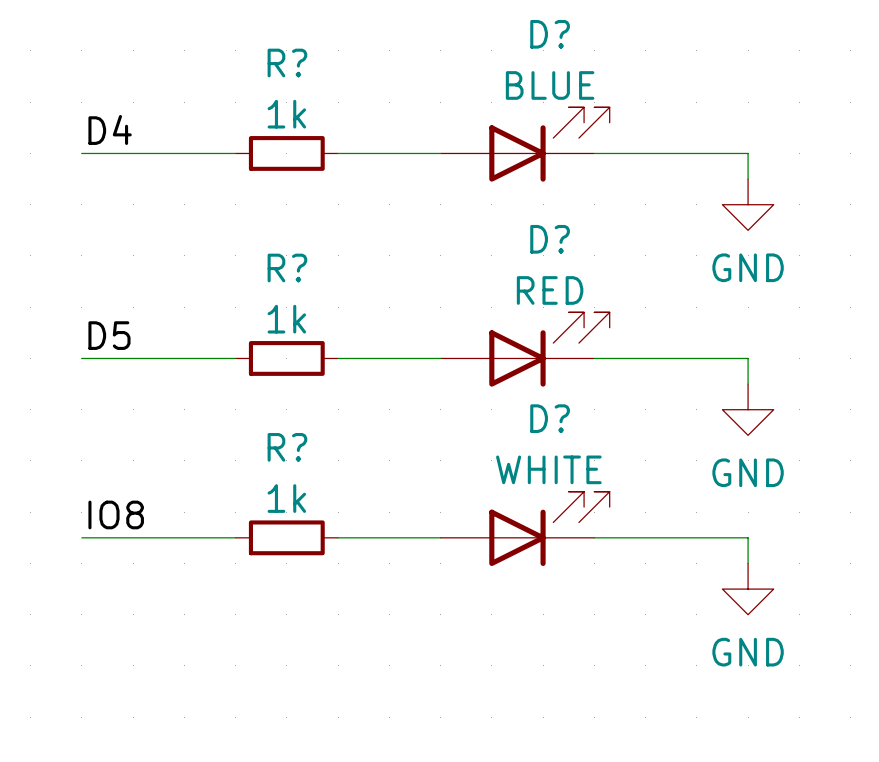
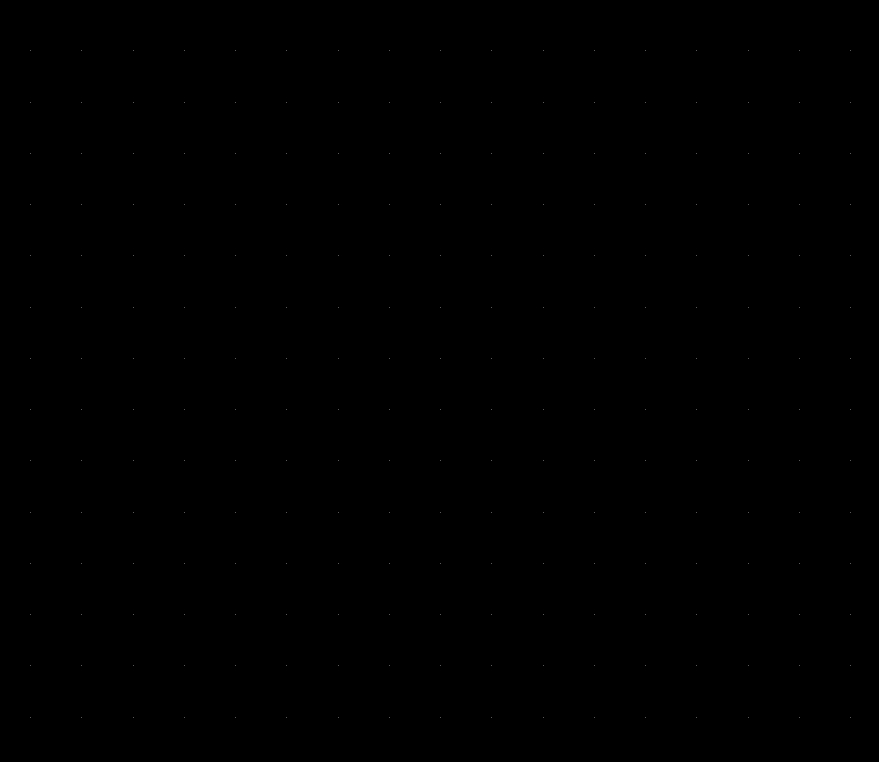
label: D4 (110, 129) -> none
D?: BLUE (525, 144) -> none
wire: (81, 153) (235, 153) -> none
R?: 1k (286, 153) -> none
wire: (338, 153) (440, 153) -> none
wire: (594, 153) (748, 153) (748, 179) -> none
power symbol: GND (748, 204) -> none
label: D5 (109, 335) -> none
D?: RED (525, 349) -> none
wire: (81, 358) (235, 358) -> none
R?: 1k (286, 358) -> none
wire: (338, 358) (440, 358) -> none
wire: (594, 358) (748, 358) (748, 384) -> none
power symbol: GND (748, 409) -> none
label: IO8 (116, 514) -> none
D?: WHITE (525, 528) -> none
wire: (81, 537) (235, 537) -> none
R?: 1k (286, 537) -> none
wire: (338, 537) (440, 537) -> none
wire: (594, 537) (748, 537) (748, 563) -> none
power symbol: GND (748, 589) -> none

